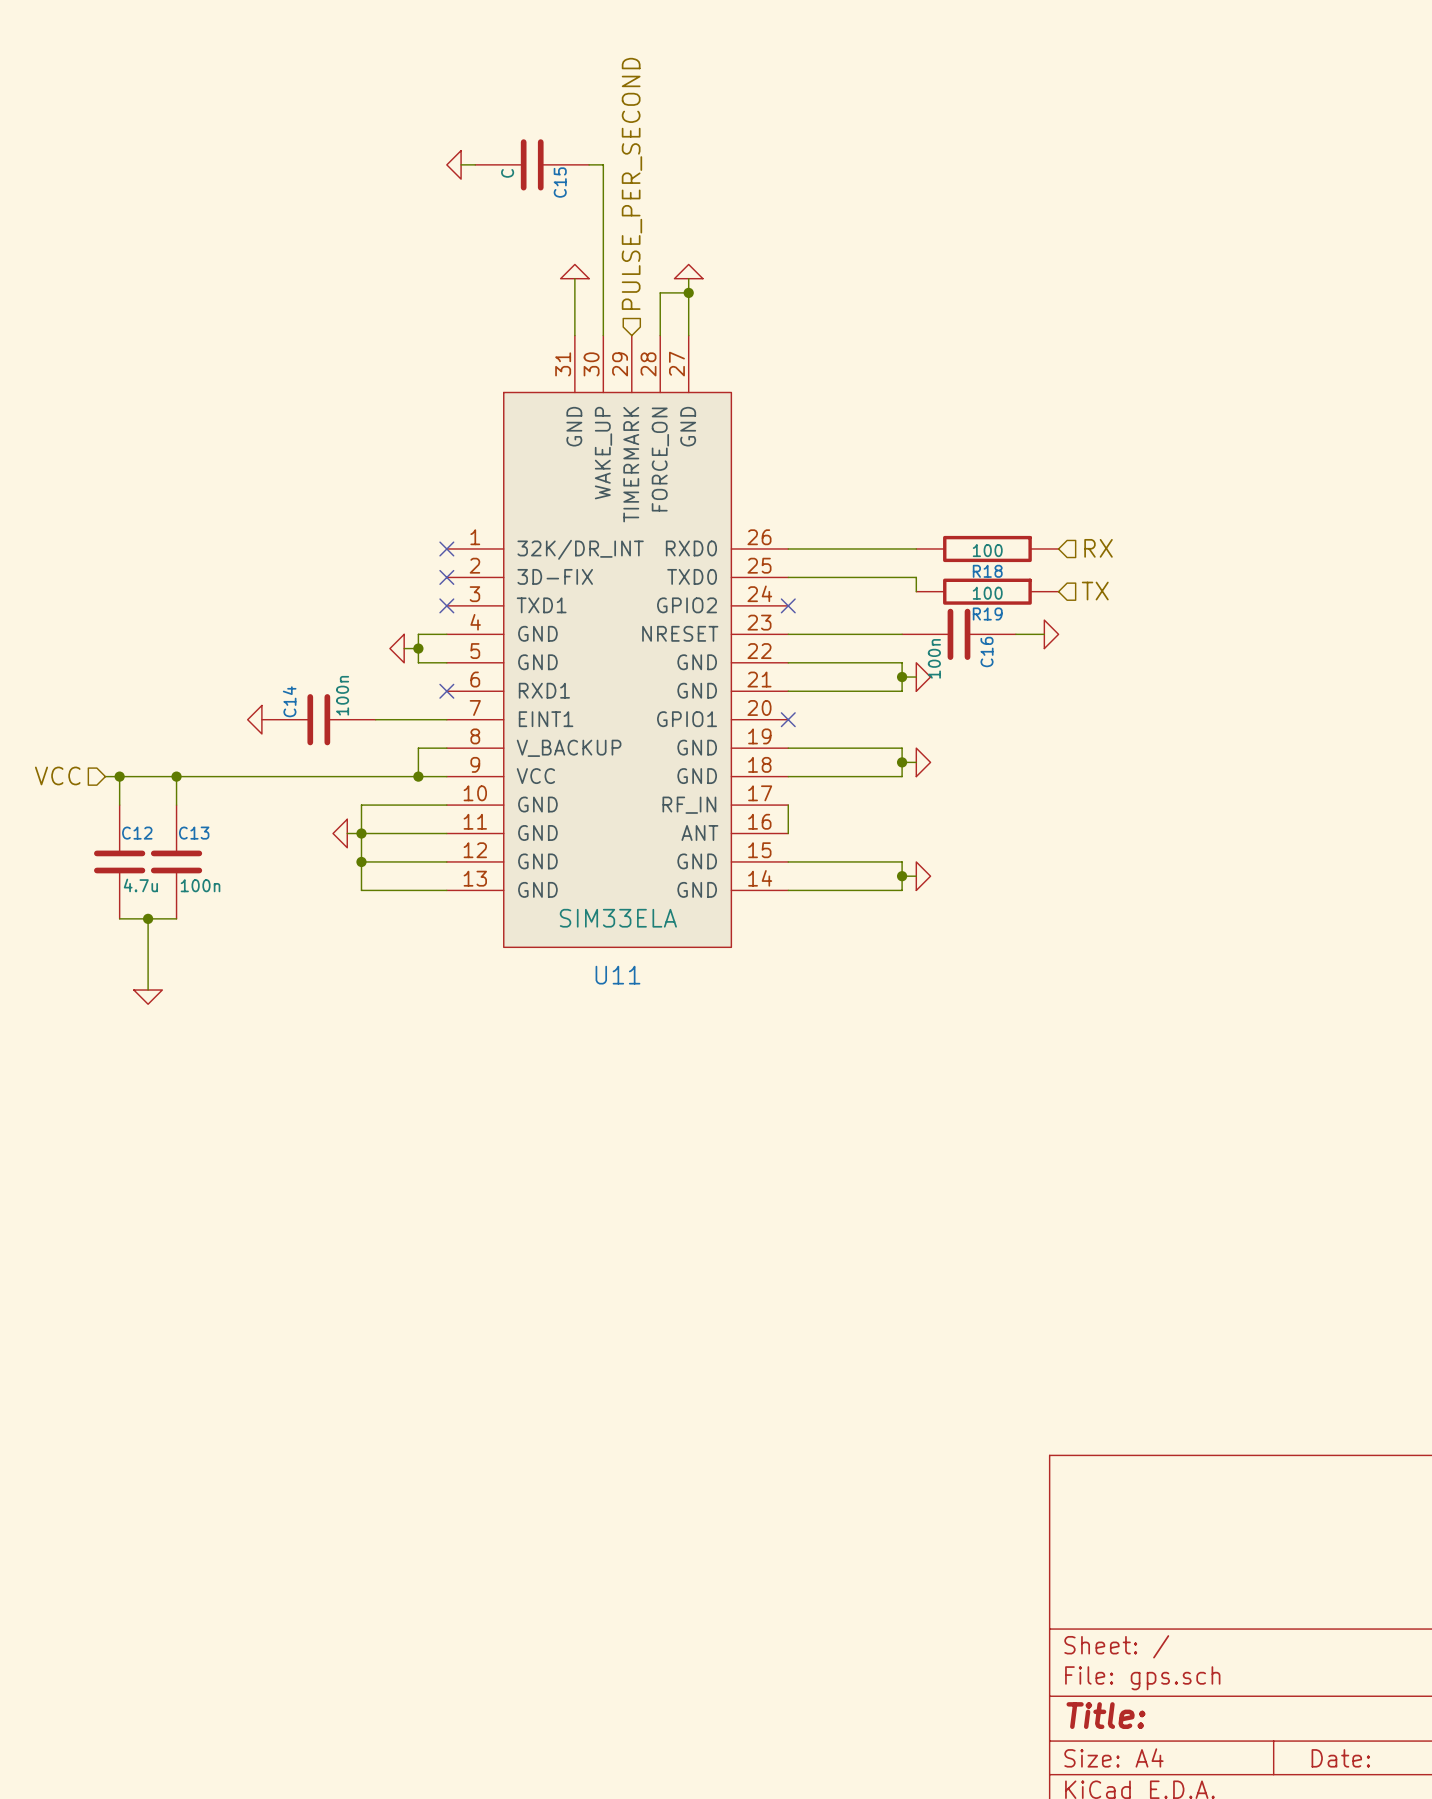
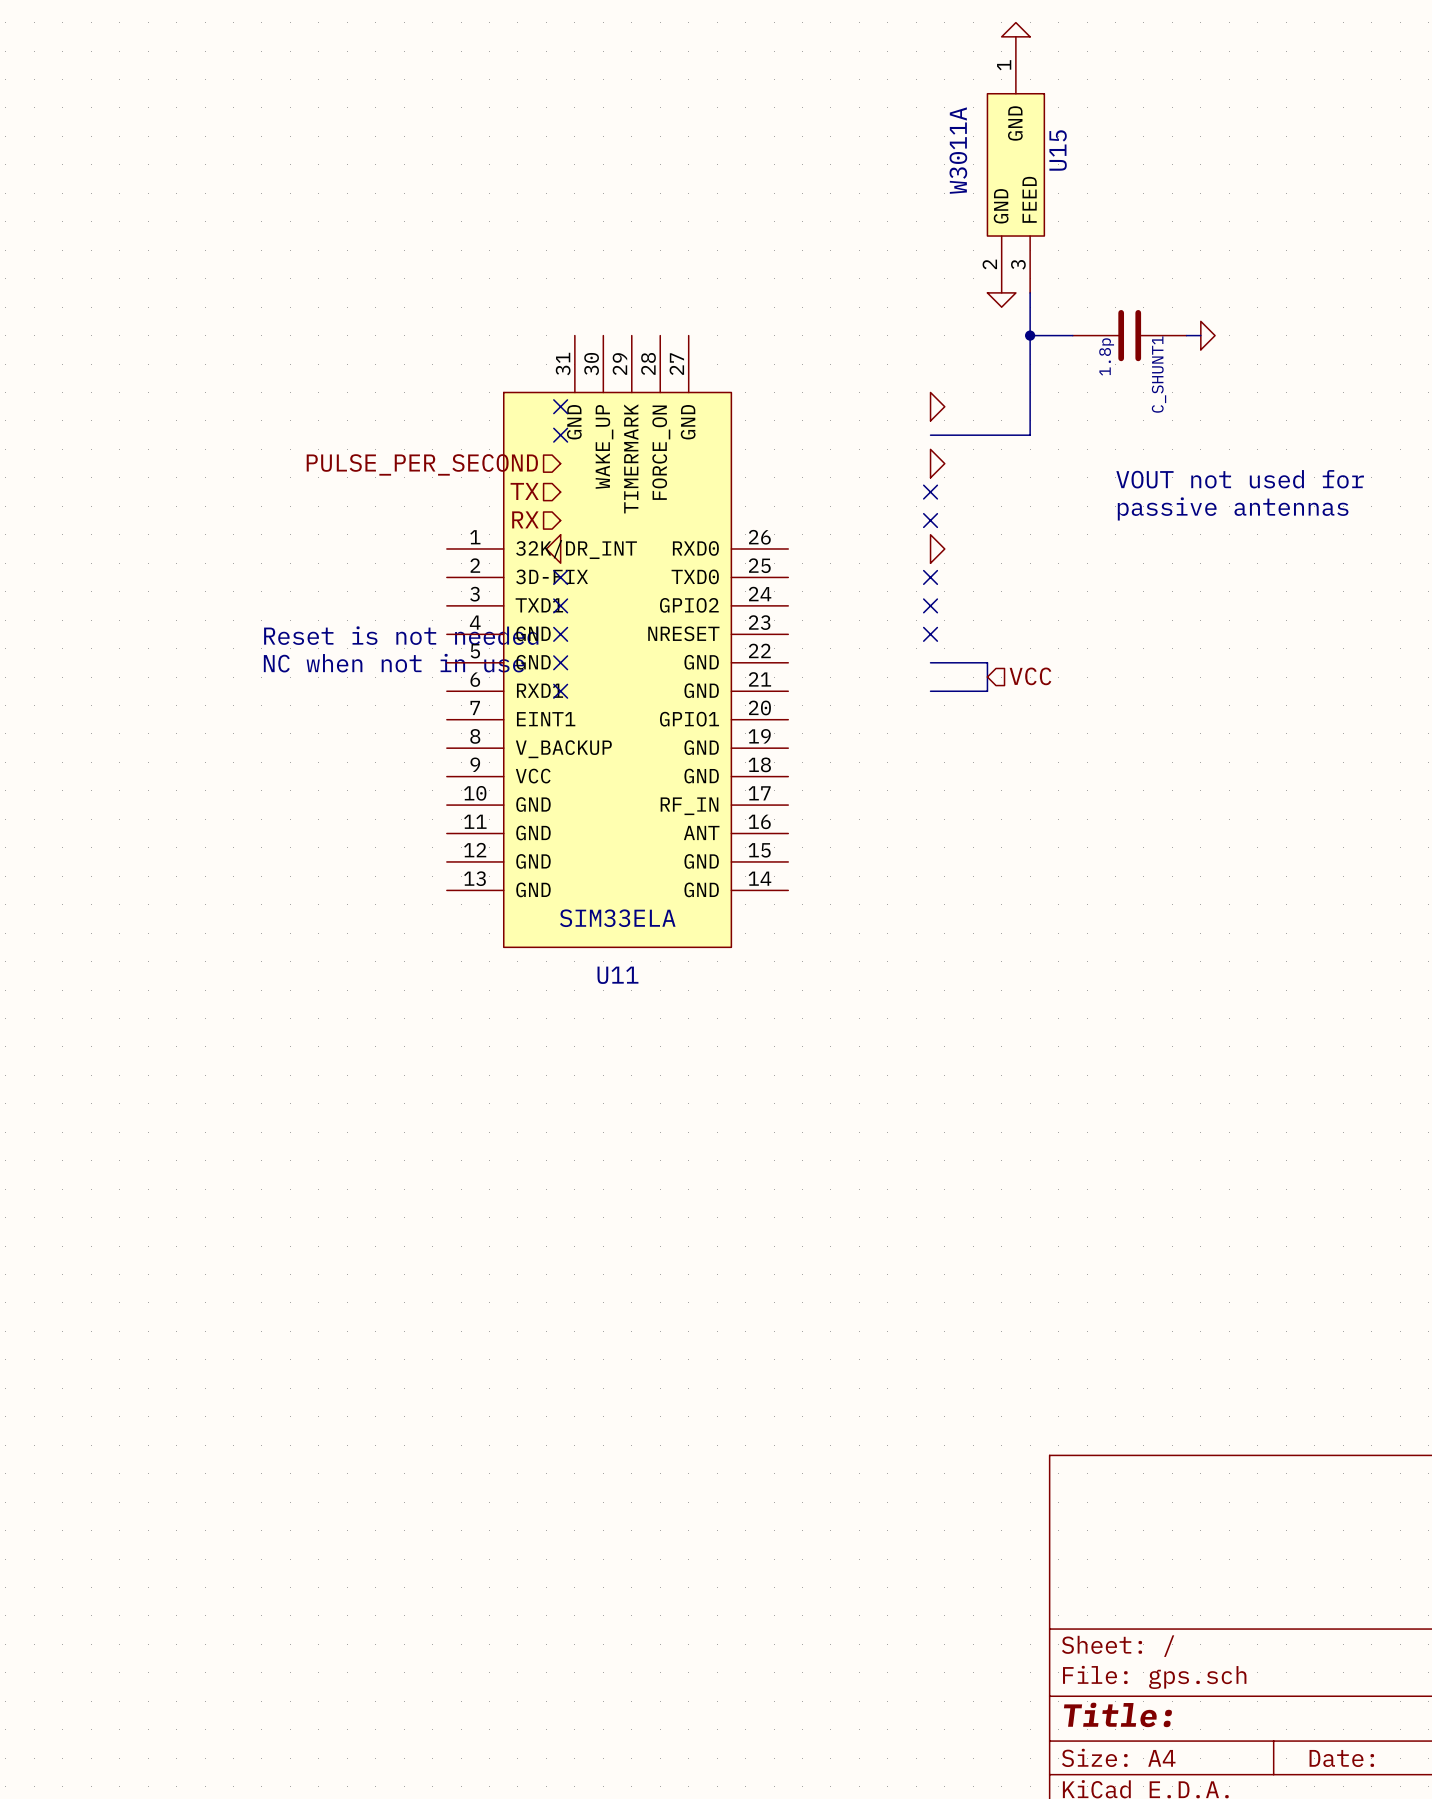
power symbol: none -> (1015, 29)
power symbol: (453, 164) -> none
wire: (461, 164) (475, 164) -> none
C15: C (532, 164) -> none
wire: (589, 164) (603, 164) (603, 335) -> none
U15: none -> W3011A (1015, 164)
hierarchical label rotation: 0° (631, 183) -> 90° counterclockwise (422, 464)
hierarchical label position: PULSE_PER_SECOND (631, 183) -> PULSE_PER_SECOND (422, 464)
power symbol: (574, 271) -> none
power symbol: (688, 271) -> none
wire: (574, 278) (574, 335) -> none
wire: (688, 278) (688, 335) -> none
wire: (688, 292) (660, 292) (660, 335) -> none
junction: (688, 292) -> none
wire: none -> (1030, 292) (1030, 435) (930, 435)
power symbol: none -> (1001, 300)
wire: none -> (1030, 335) (1072, 335)
junction: none -> (1030, 335)
C_SHUNT1: none -> 1.8p (1129, 335)
wire: none -> (1186, 335) (1200, 335)
power symbol: none -> (1207, 335)
no-connect mark: none -> (560, 406)
power symbol: none -> (937, 406)
no-connect mark: none -> (560, 435)
power symbol: none -> (937, 463)
text: none -> VOUT not used for (1240, 479)
hierarchical label: none -> TX (524, 491)
no-connect mark: none -> (930, 492)
text: none -> passive antennas (1233, 508)
hierarchical label: none -> RX (525, 519)
no-connect mark: none -> (930, 520)
no-connect mark: (446, 548) -> none
power symbol: none -> (553, 548)
wire: (788, 548) (916, 548) -> none
power symbol: none -> (937, 548)
R18: 100 (987, 548) -> none
hierarchical label: RX (1098, 548) -> none
no-connect mark: (446, 577) -> none
no-connect mark: none -> (560, 577)
wire: (788, 577) (916, 577) (916, 591) -> none
no-connect mark: none -> (930, 577)
R19: 100 (987, 591) -> none
hierarchical label: TX (1095, 591) -> none
no-connect mark: (446, 605) -> none
no-connect mark: none -> (560, 605)
no-connect mark: (788, 605) -> none
no-connect mark: none -> (930, 605)
wire: (446, 634) (418, 634) (418, 662) (446, 662) -> none
no-connect mark: none -> (560, 634)
wire: (788, 634) (902, 634) -> none
no-connect mark: none -> (930, 634)
C16: 100n (958, 634) -> none
wire: (1015, 634) (1044, 634) -> none
power symbol: (1051, 634) -> none
text: none -> Reset is not needed (401, 635)
power symbol: (397, 648) -> none
wire: (404, 648) (418, 648) -> none
junction: (418, 648) -> none
no-connect mark: none -> (560, 662)
wire: (788, 662) (902, 662) (902, 691) (788, 691) -> none
wire: none -> (930, 662) (987, 662) (987, 691) (930, 691)
text: none -> NC when not in use (394, 663)
hierarchical label: none -> VCC (1030, 676)
wire: (902, 677) (916, 677) -> none
junction: (902, 677) -> none
power symbol: (923, 677) -> none
no-connect mark: (446, 691) -> none
no-connect mark: none -> (560, 691)
power symbol: (254, 719) -> none
C14: 100n (318, 719) -> none
wire: (375, 719) (446, 719) -> none
no-connect mark: (788, 719) -> none
wire: (446, 748) (418, 748) (418, 776) -> none
wire: (788, 748) (902, 748) (902, 776) (788, 776) -> none
wire: (902, 762) (916, 762) -> none
junction: (902, 762) -> none
power symbol: (923, 762) -> none
hierarchical label: VCC (57, 775) -> none
wire: (105, 776) (446, 776) -> none
wire: (119, 776) (119, 805) -> none
junction: (119, 776) -> none
wire: (176, 776) (176, 805) -> none
junction: (176, 776) -> none
junction: (418, 776) -> none
wire: (446, 805) (361, 805) (361, 890) (446, 890) -> none
wire: (788, 805) (788, 833) -> none
power symbol: (340, 833) -> none
wire: (347, 833) (446, 833) -> none
junction: (361, 833) -> none
C12: 4.7u (119, 861) -> none
C13: 100n (176, 861) -> none
wire: (361, 861) (446, 861) -> none
junction: (361, 861) -> none
wire: (788, 861) (902, 861) (902, 890) (788, 890) -> none
wire: (902, 876) (916, 876) -> none
junction: (902, 876) -> none
power symbol: (923, 876) -> none
wire: (119, 918) (176, 918) -> none
wire: (148, 918) (148, 990) -> none
junction: (148, 918) -> none
power symbol: (148, 997) -> none

